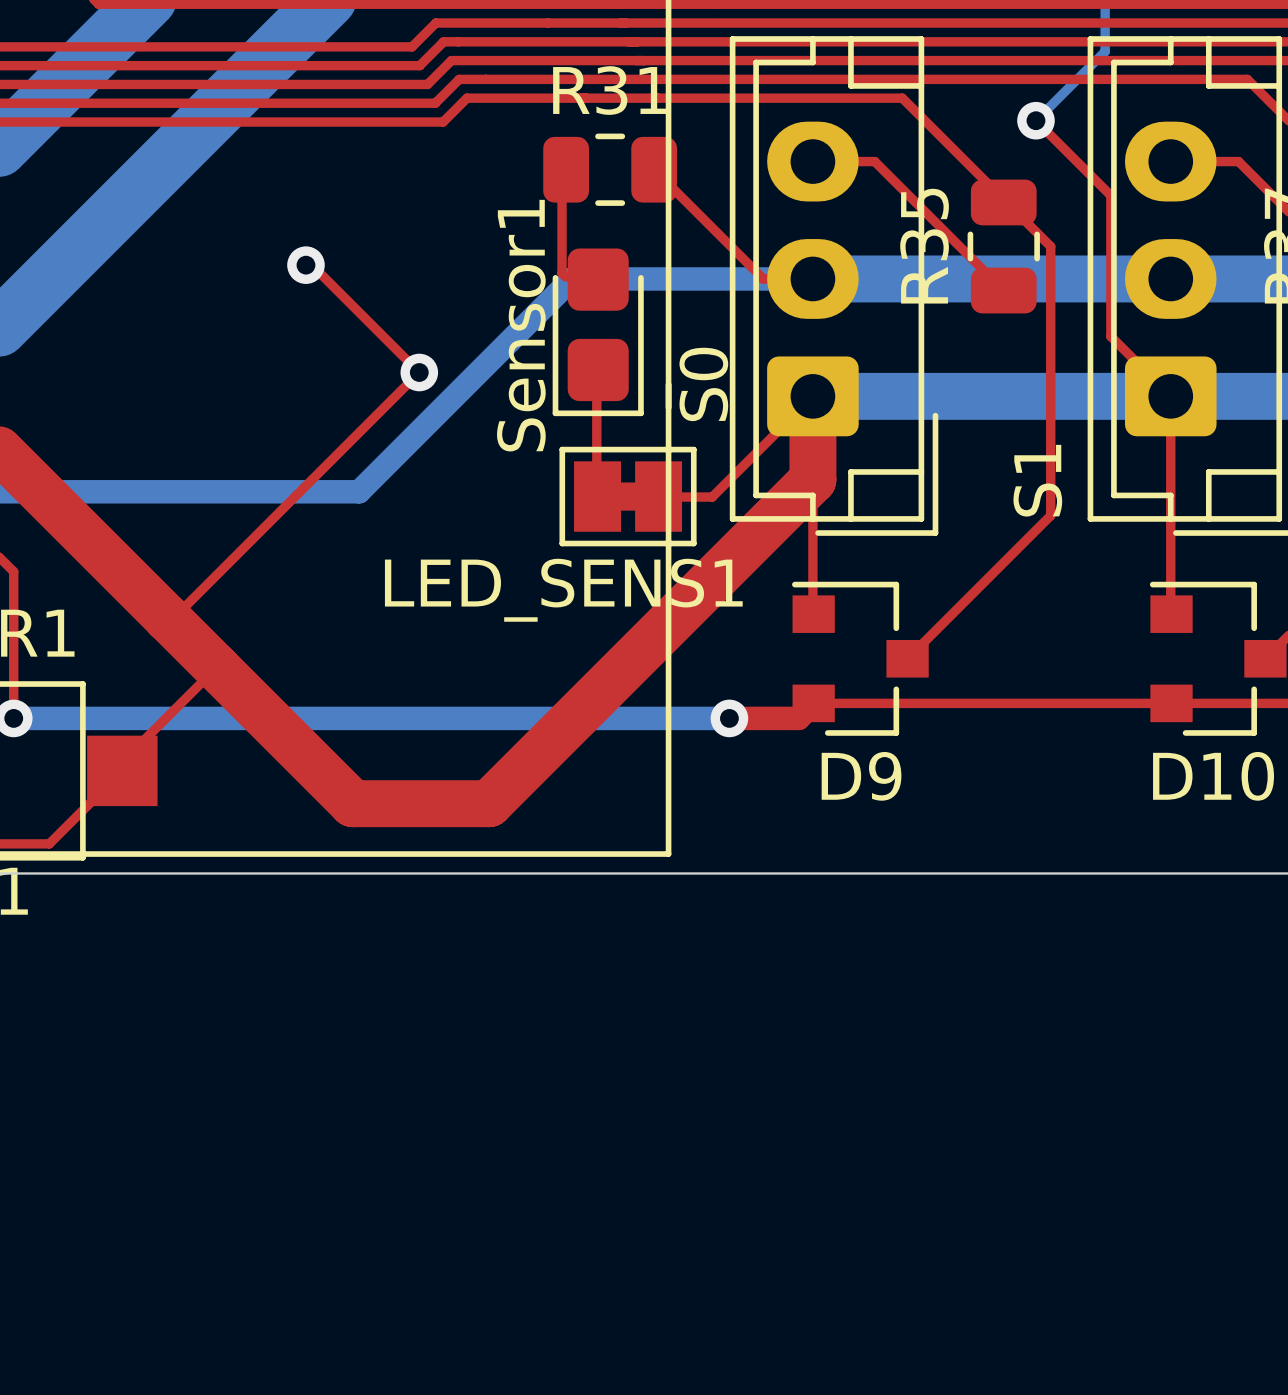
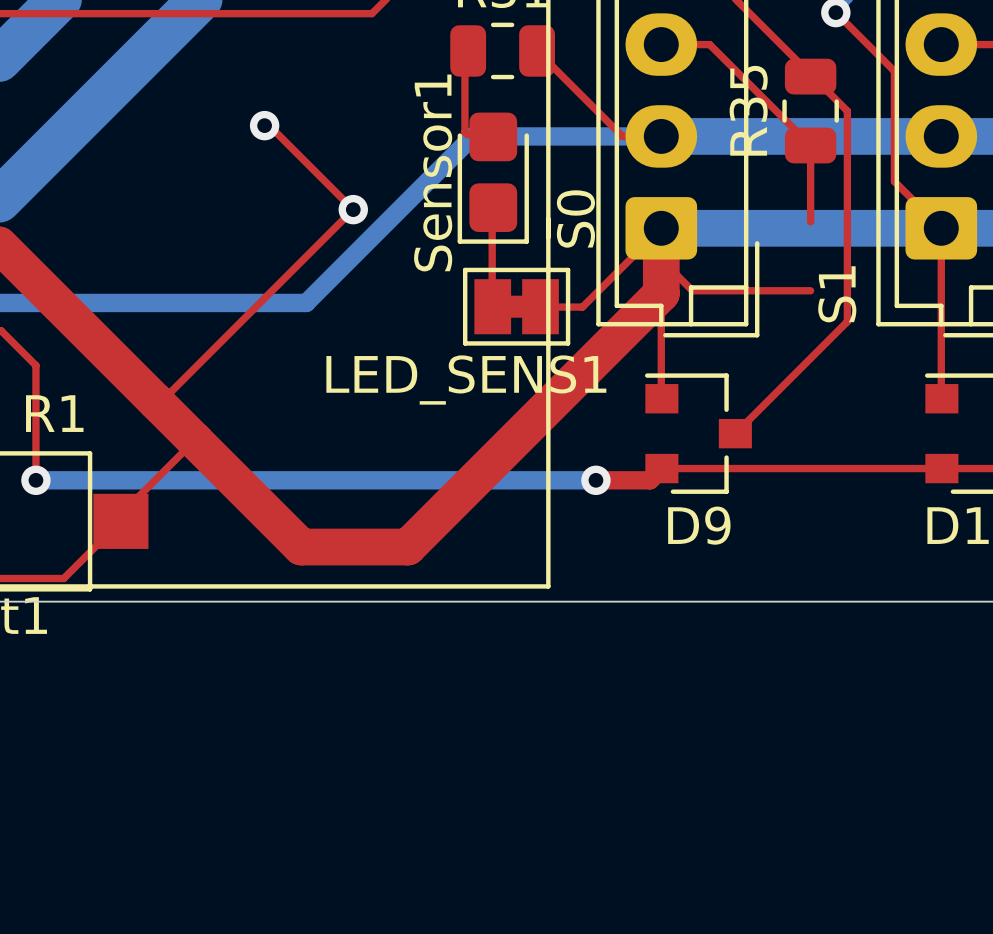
top track: none -> (810, 145) (810, 221)
top track: none -> (661, 259) (692, 290) (810, 290)

